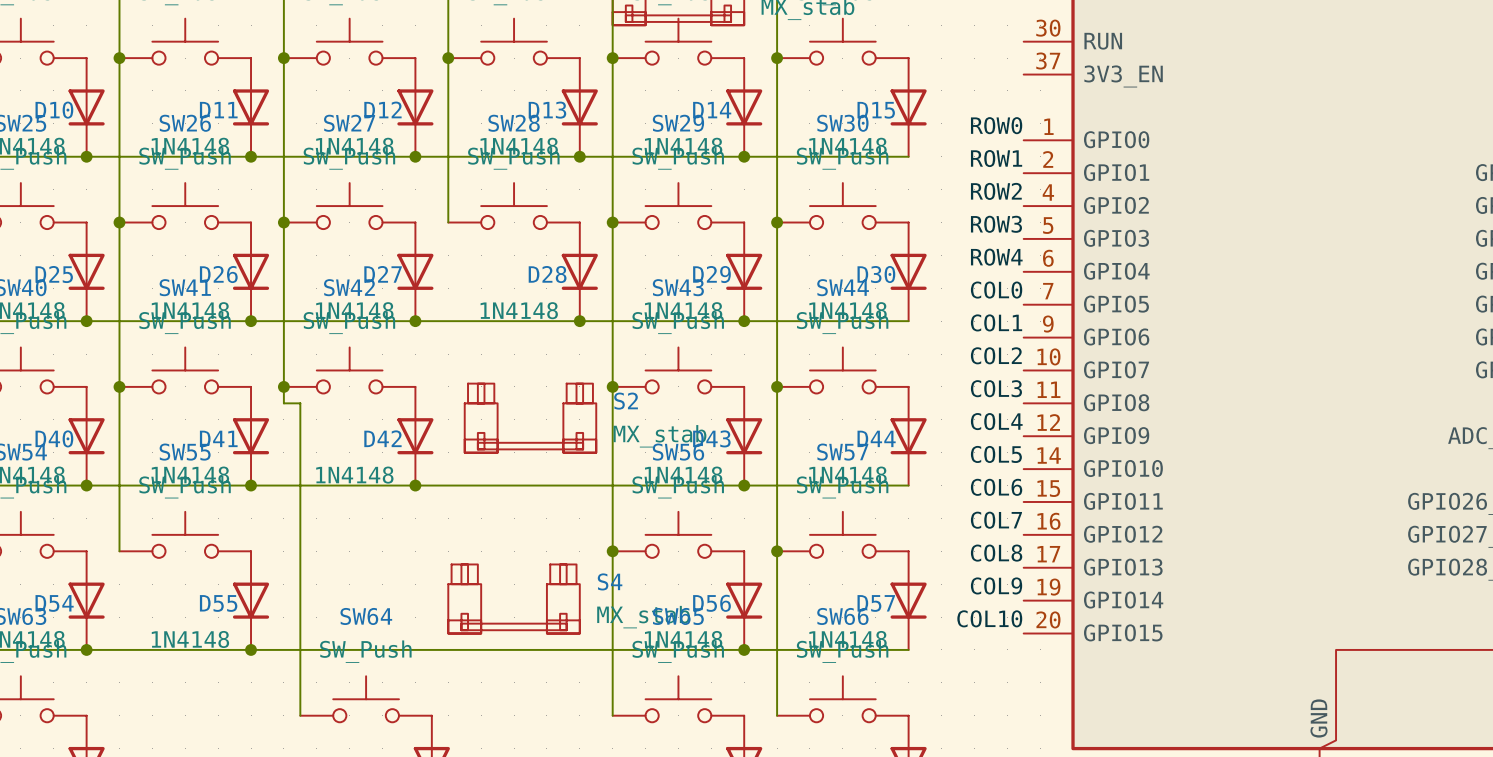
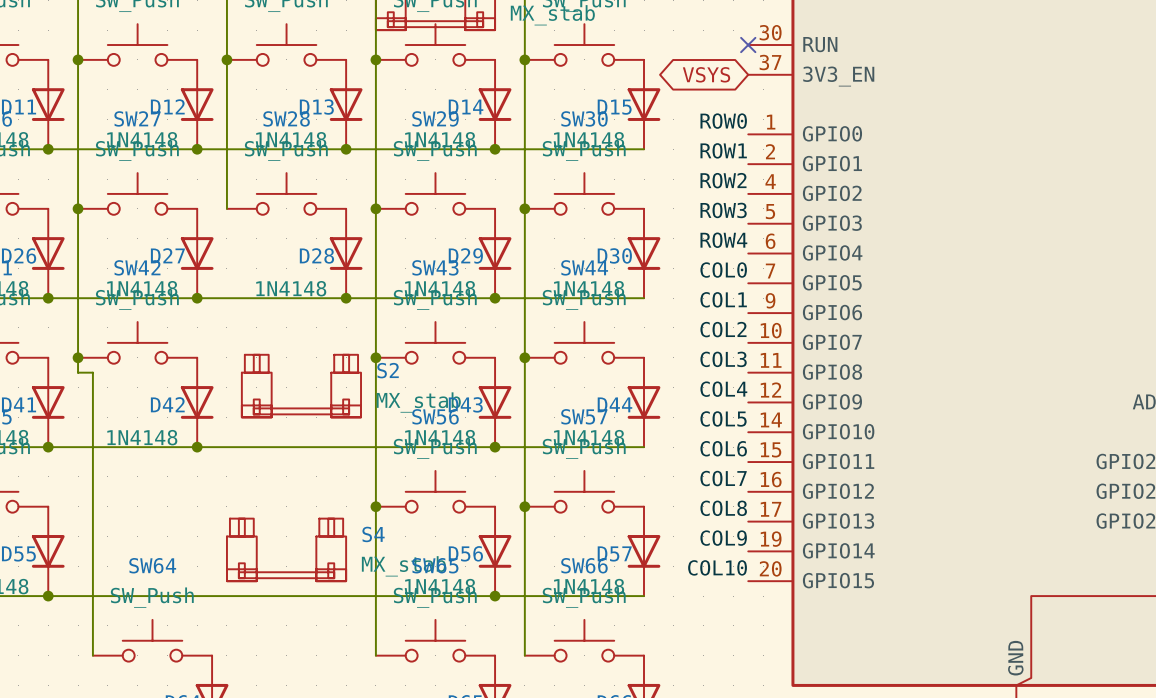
no-connect mark: none -> (748, 45)
global label: none -> VSYS (706, 74)

